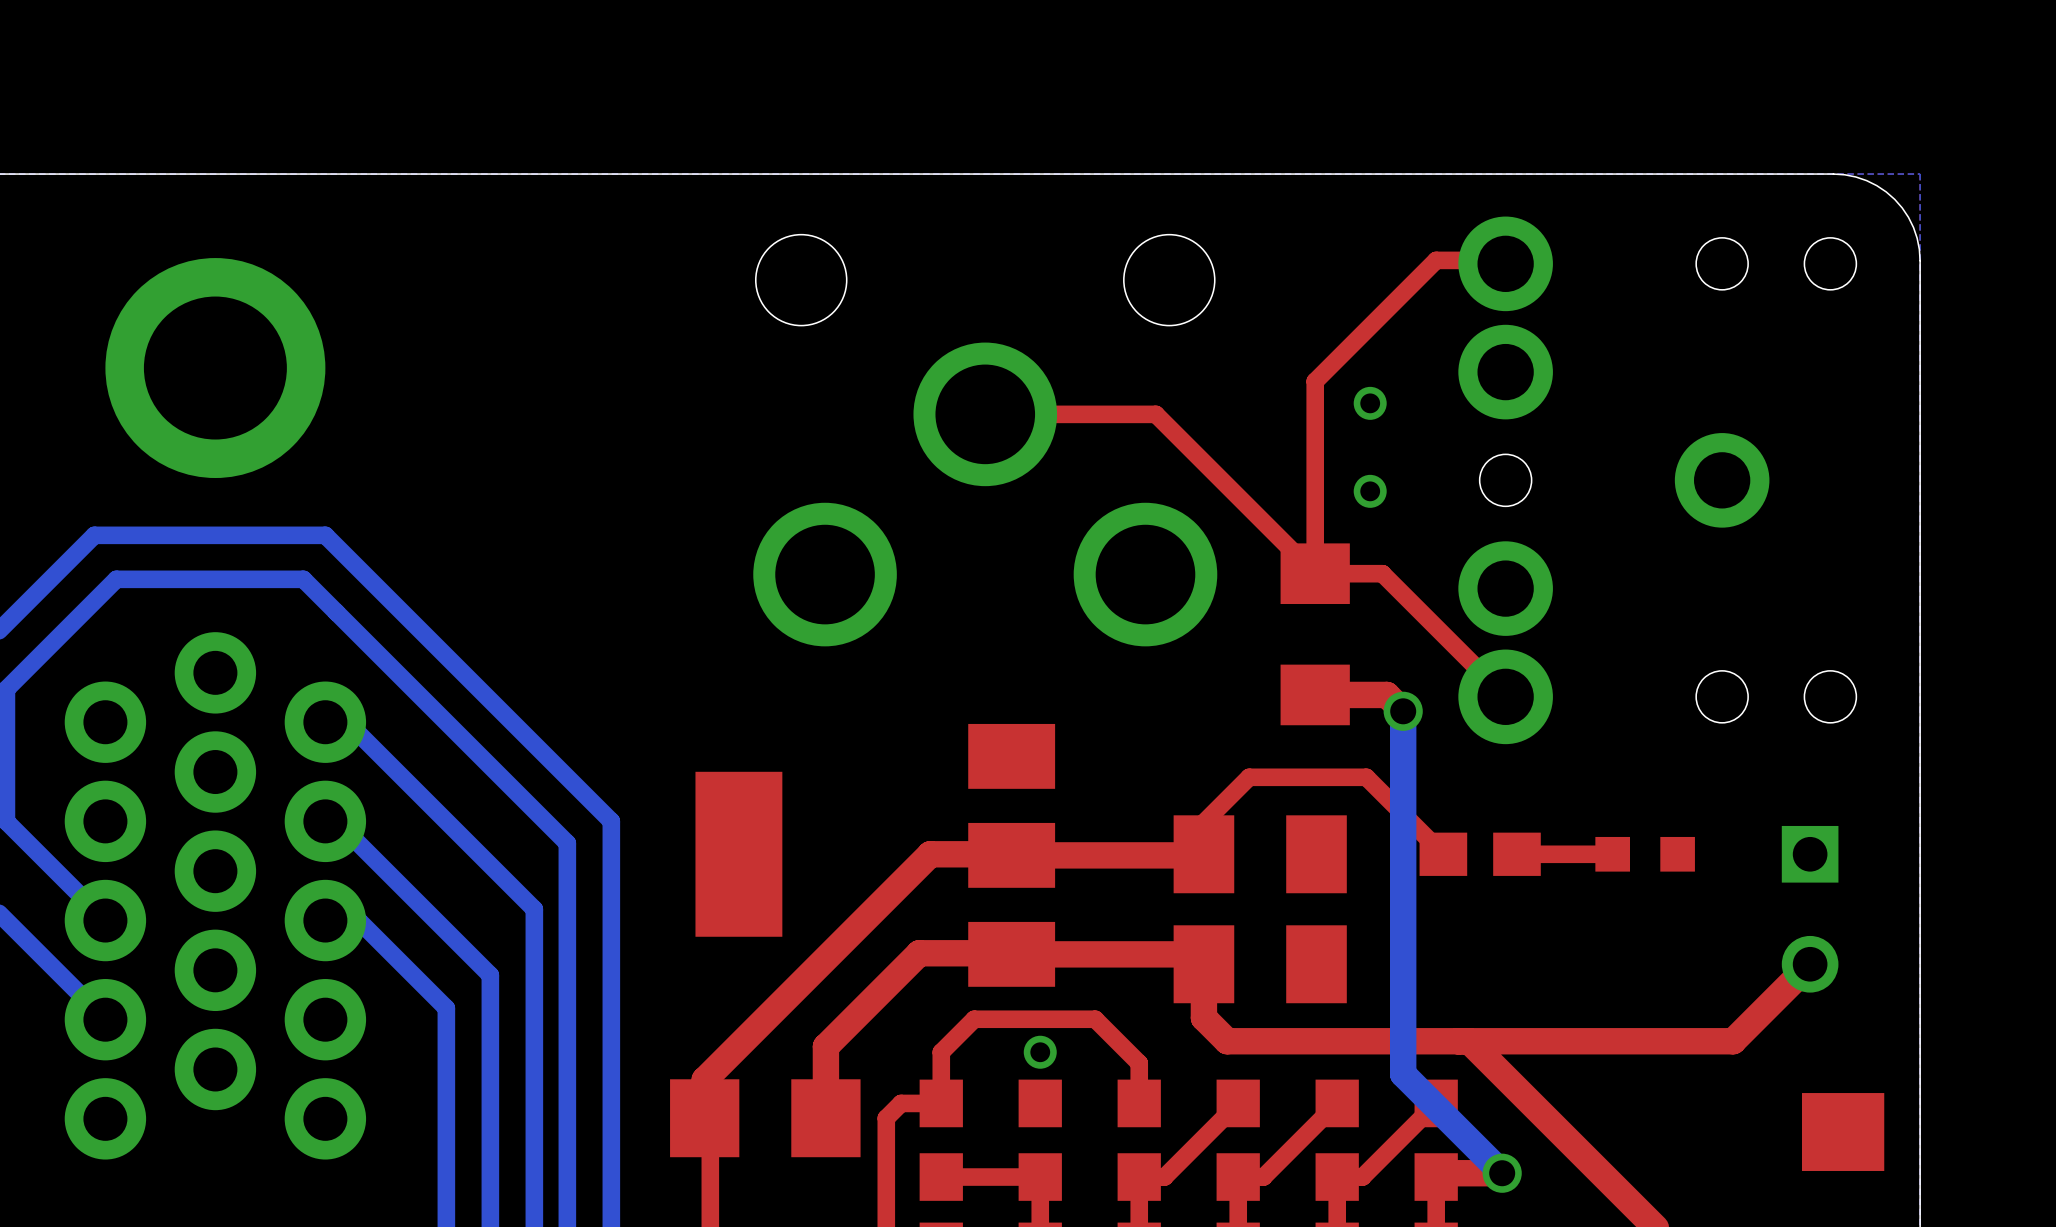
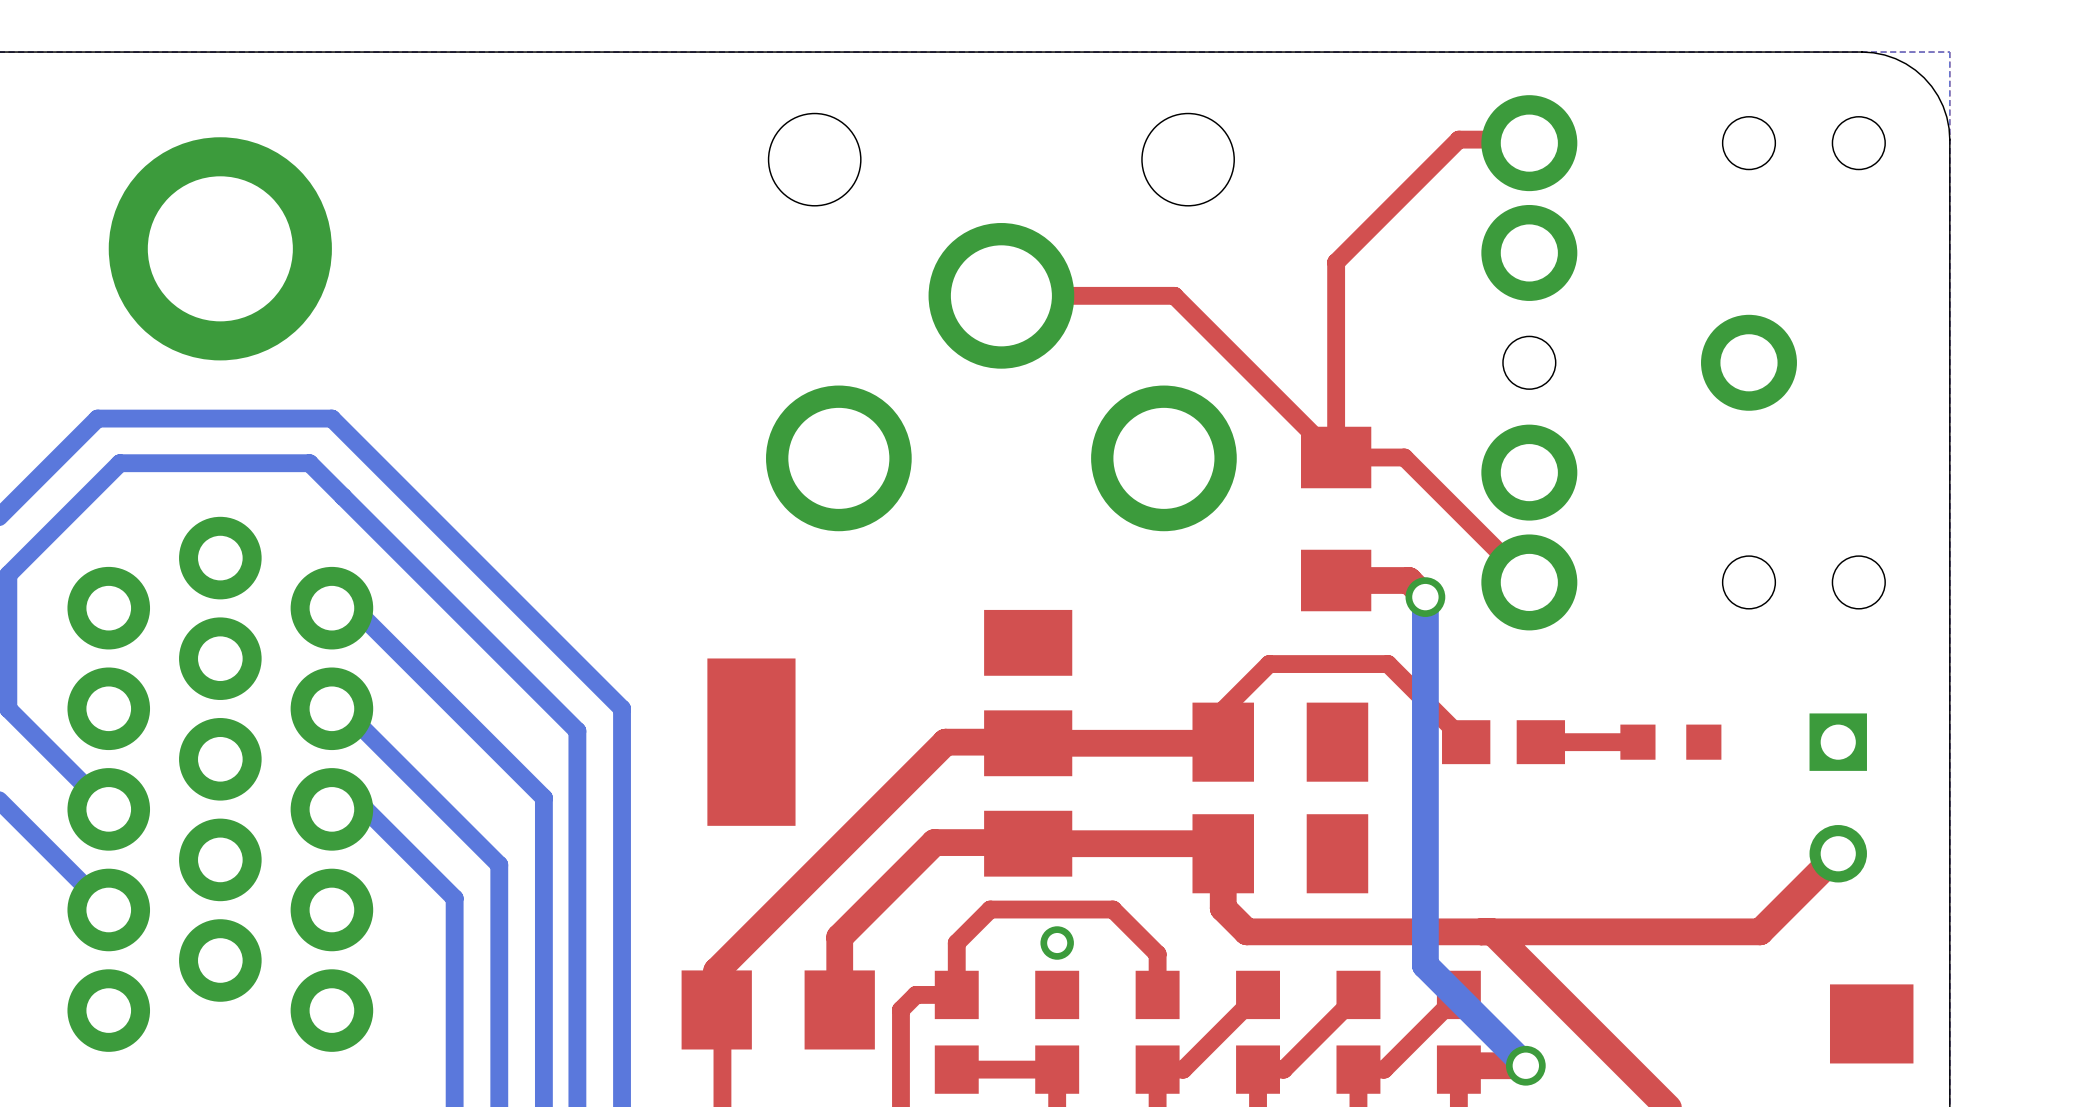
via: (1370, 403) -> none
via: (1370, 491) -> none

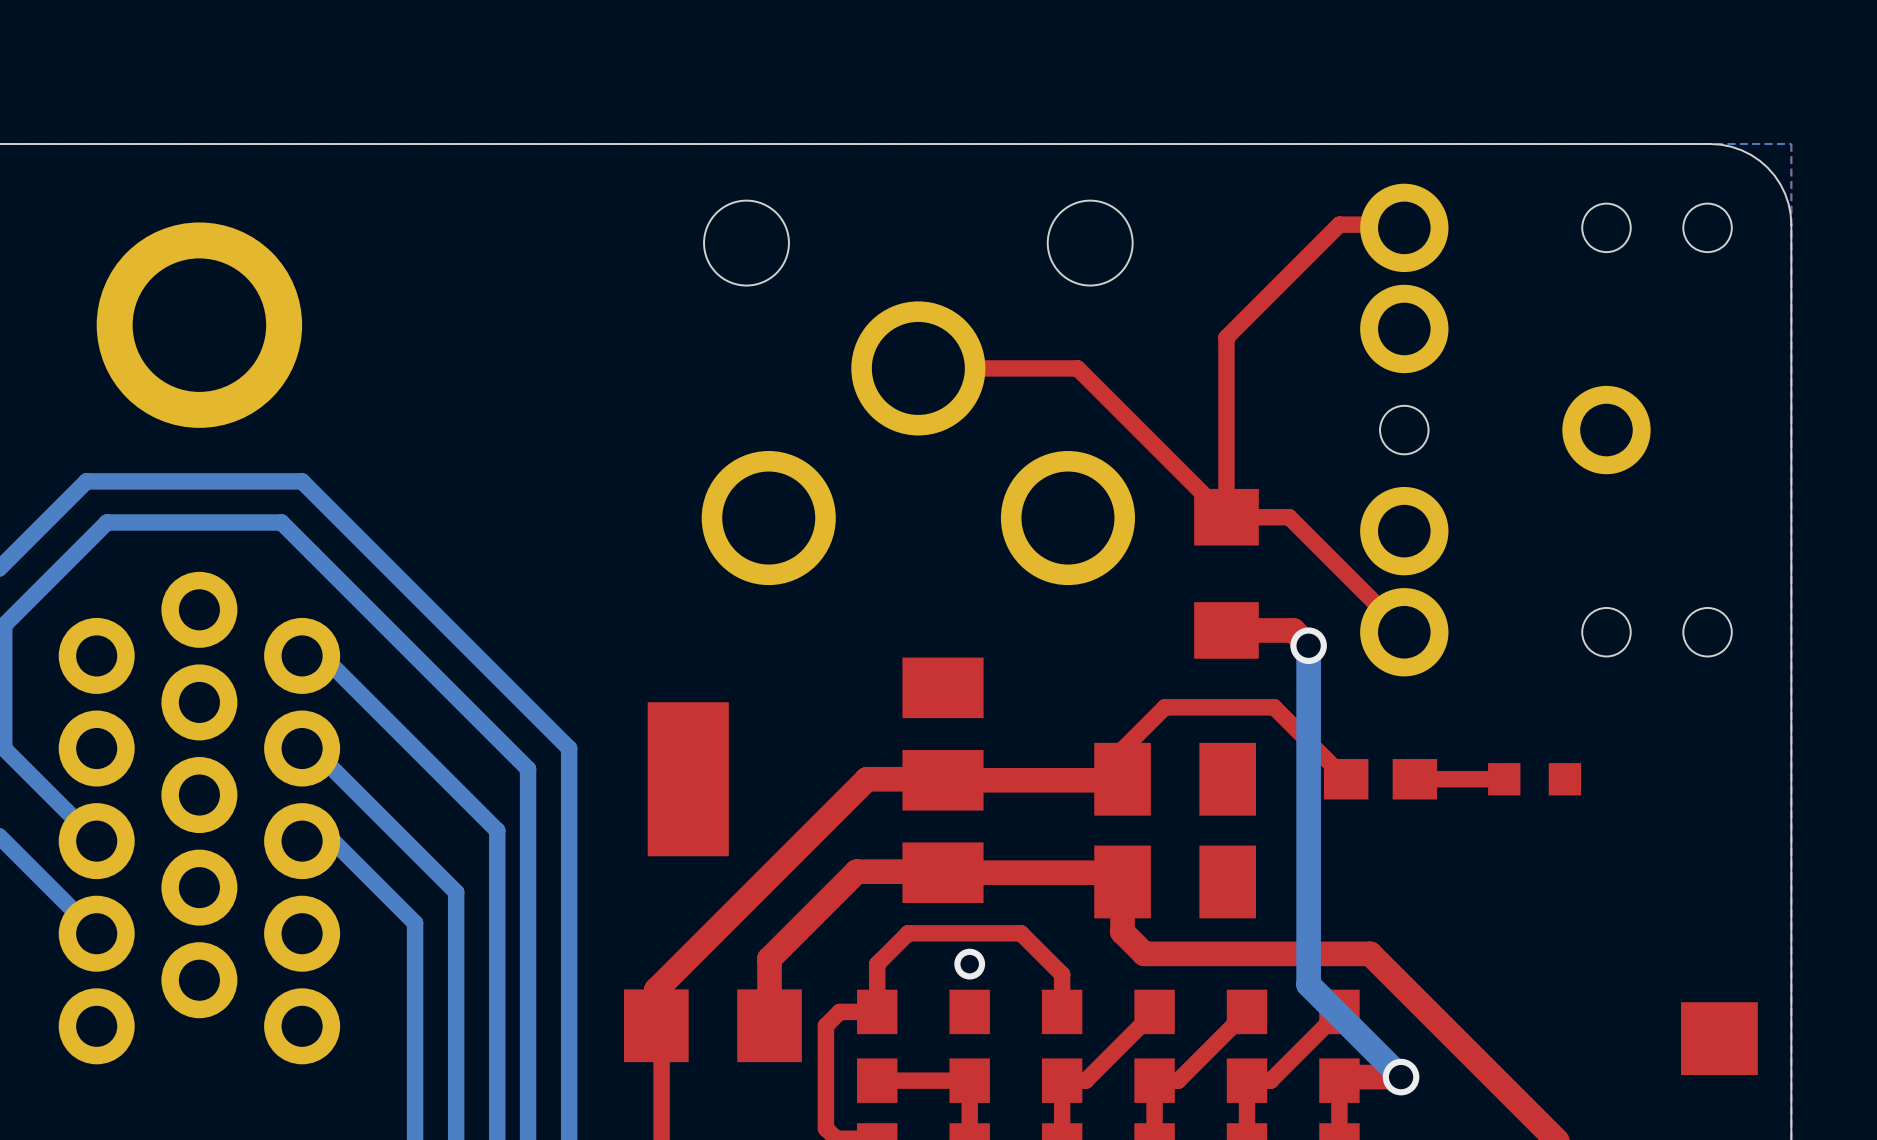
part: (1838, 797) -> none
top track: (1838, 853) (1760, 931) (1492, 931) -> none

